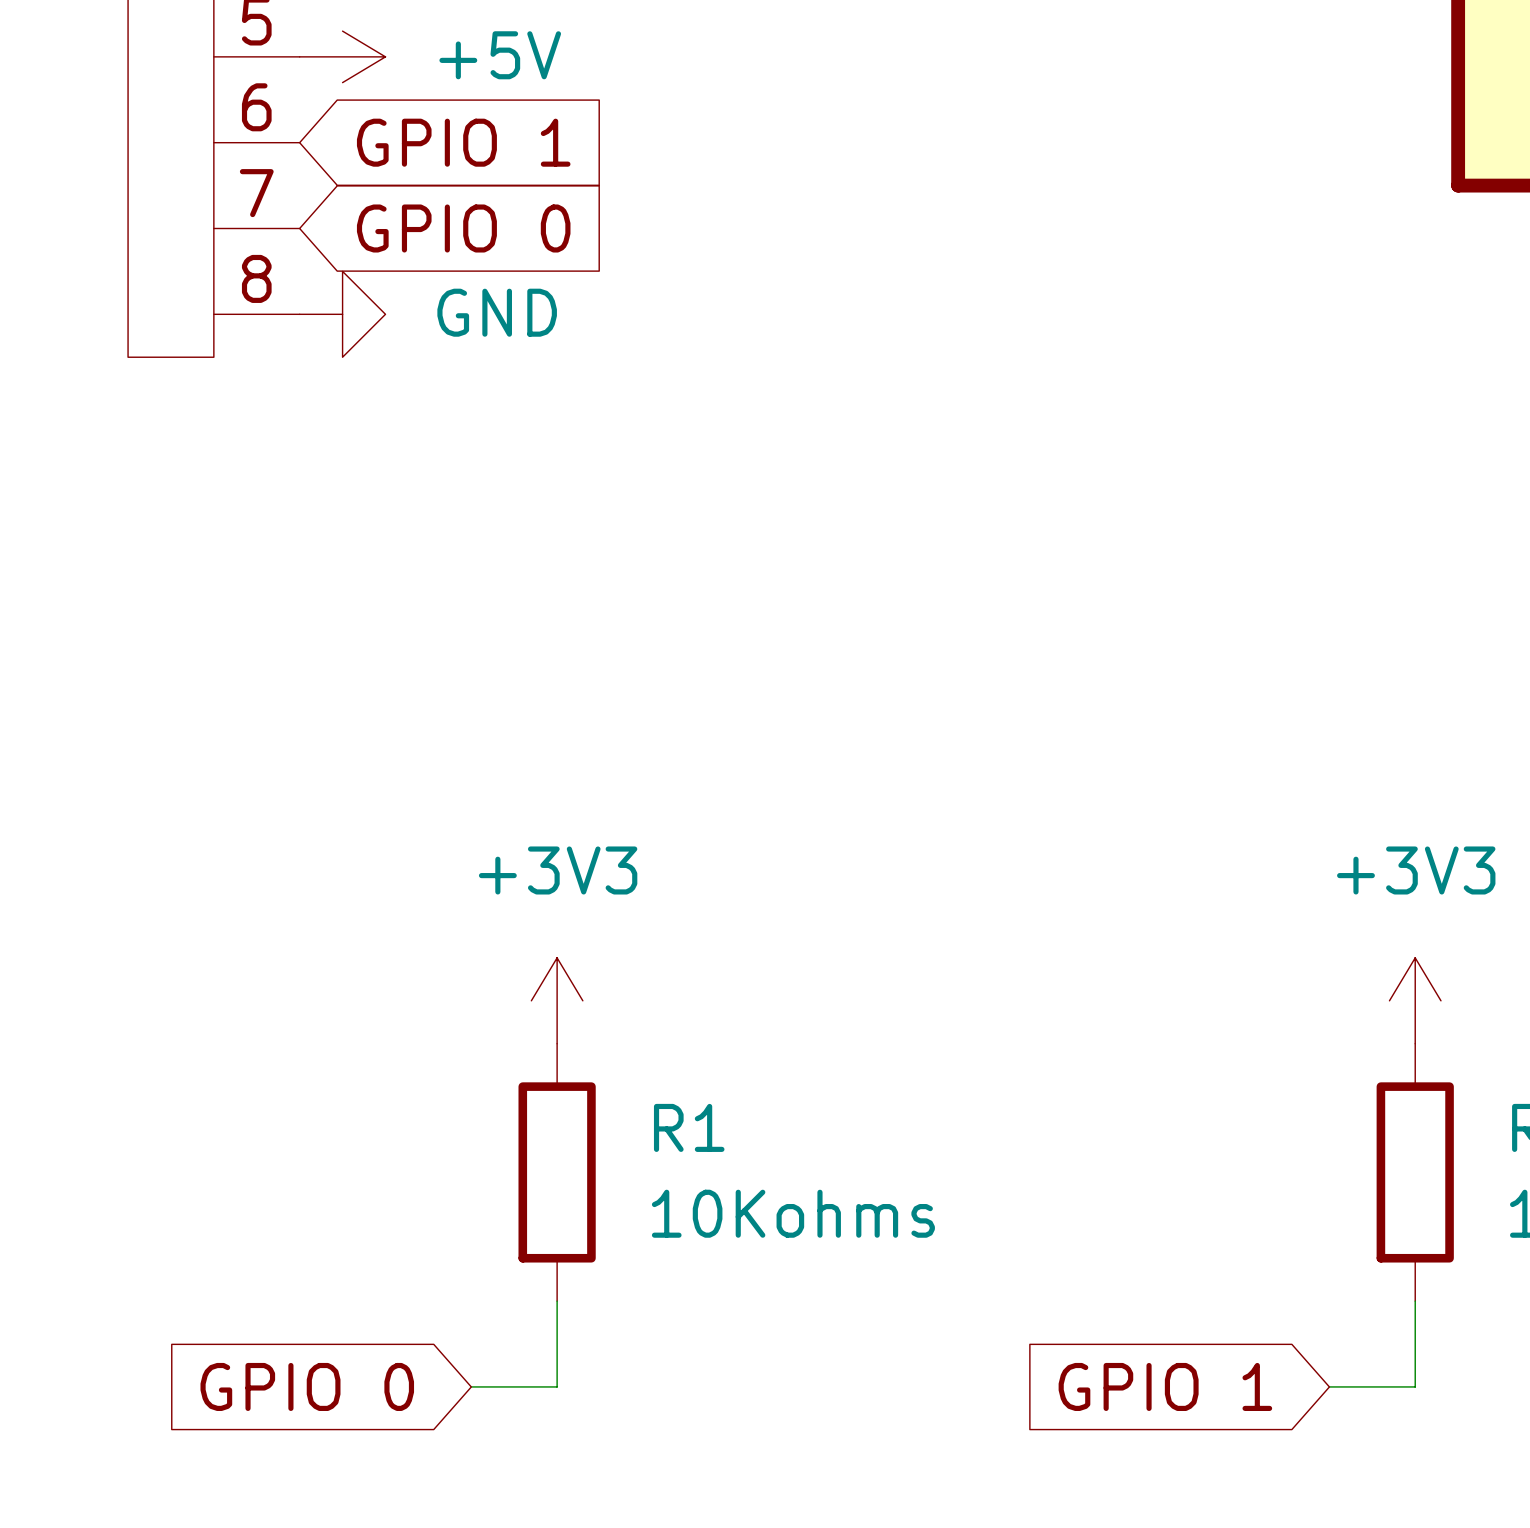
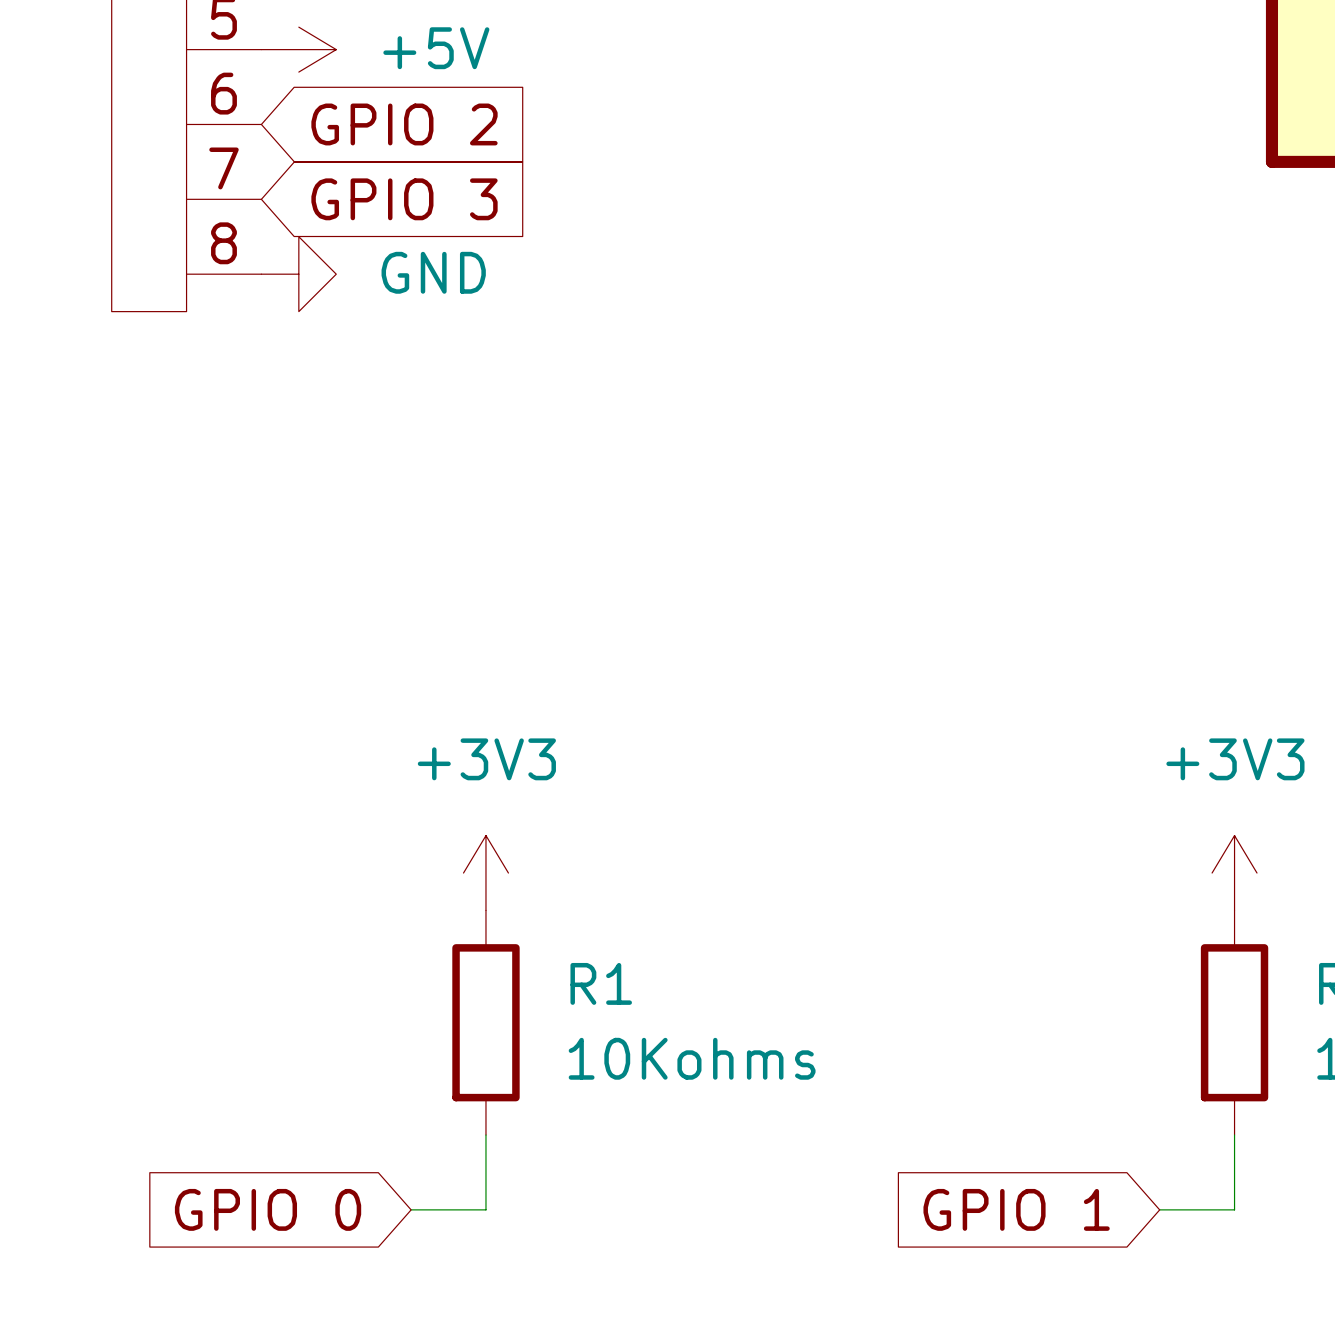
global label: GPIO 1 (463, 142) -> GPIO 2 (404, 124)
global label: GPIO 0 (463, 228) -> GPIO 3 (404, 199)

